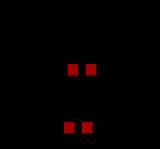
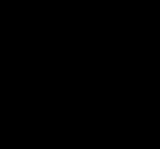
part: (82, 69) -> none
part: (78, 127) -> none

